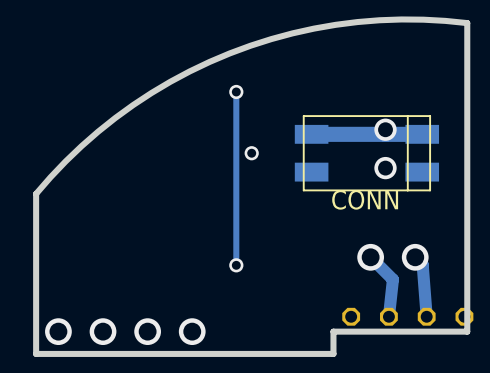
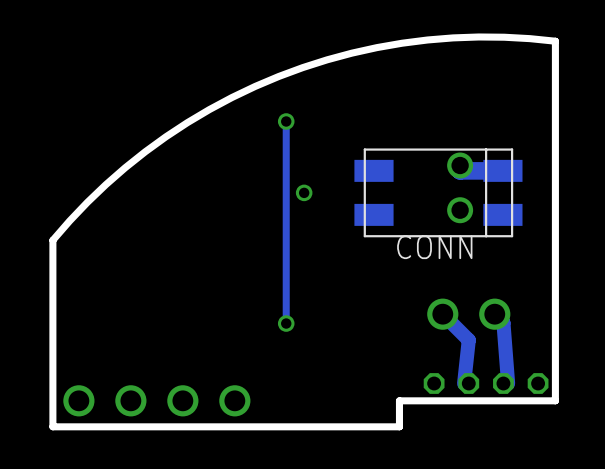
track: (385, 134) (311, 134) -> none
part footprint: [342, 307, 474, 326] -> [423, 373, 549, 394]

